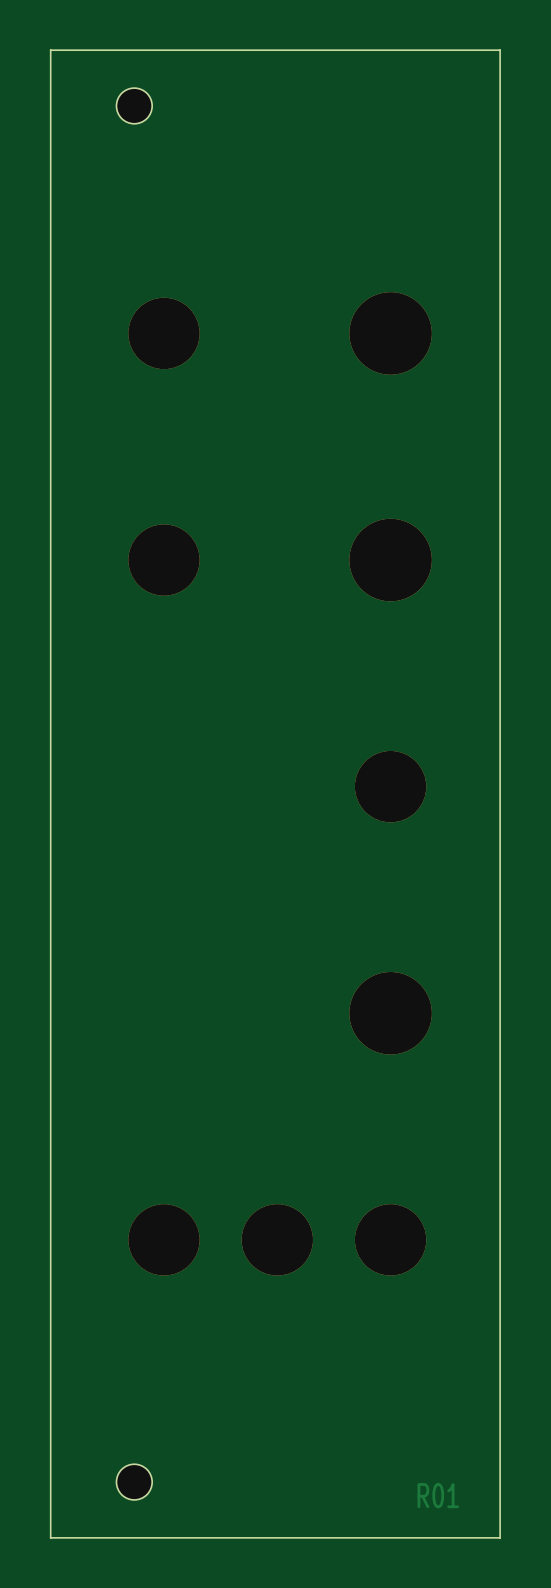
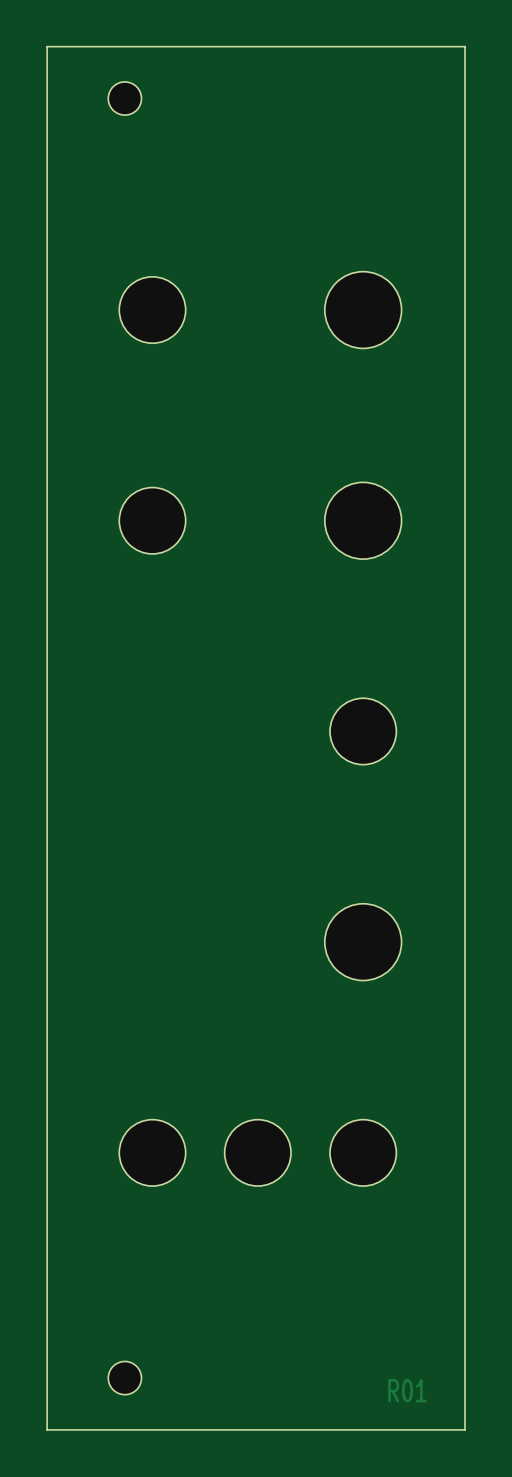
part footprint: [349, 292, 432, 375] -> [324, 271, 402, 349]
part footprint: [128, 297, 200, 370] -> [119, 276, 186, 344]
part footprint: [349, 518, 432, 602] -> [324, 482, 402, 560]
part footprint: [128, 524, 200, 596] -> [119, 487, 186, 554]
part footprint: [354, 750, 427, 823] -> [330, 698, 397, 765]
part footprint: [349, 972, 432, 1055] -> [324, 903, 402, 981]
part footprint: [128, 1204, 200, 1276] -> [119, 1119, 186, 1187]
part footprint: [241, 1204, 313, 1276] -> [224, 1119, 292, 1187]
part footprint: [354, 1204, 427, 1276] -> [330, 1119, 397, 1187]

